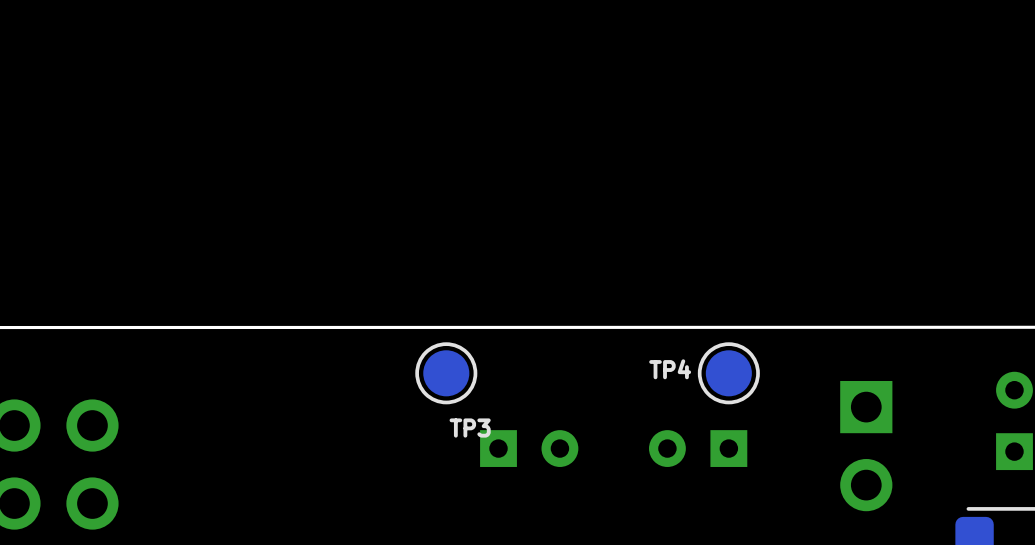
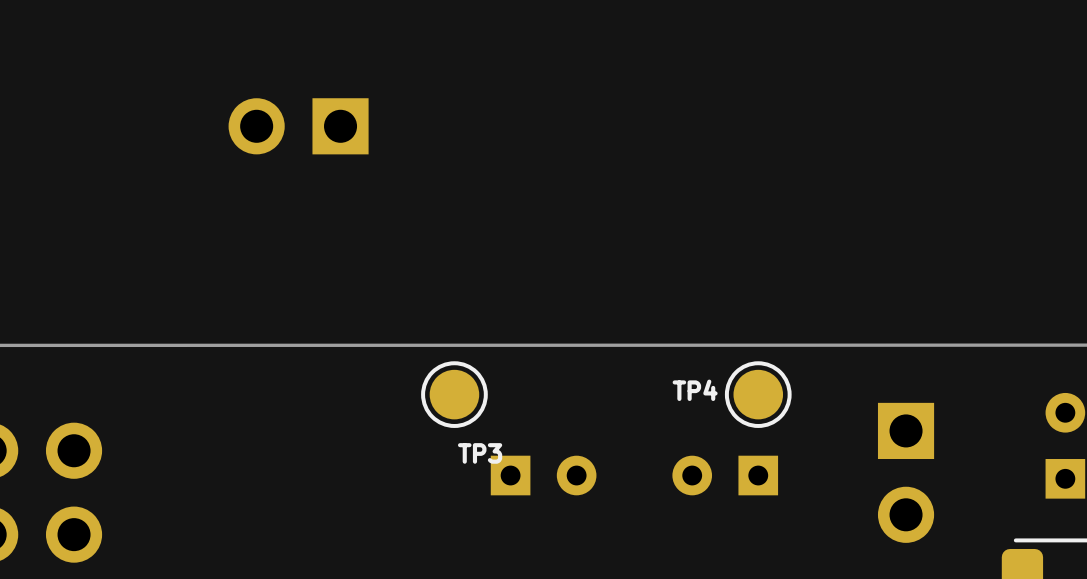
part: none -> (298, 126)

